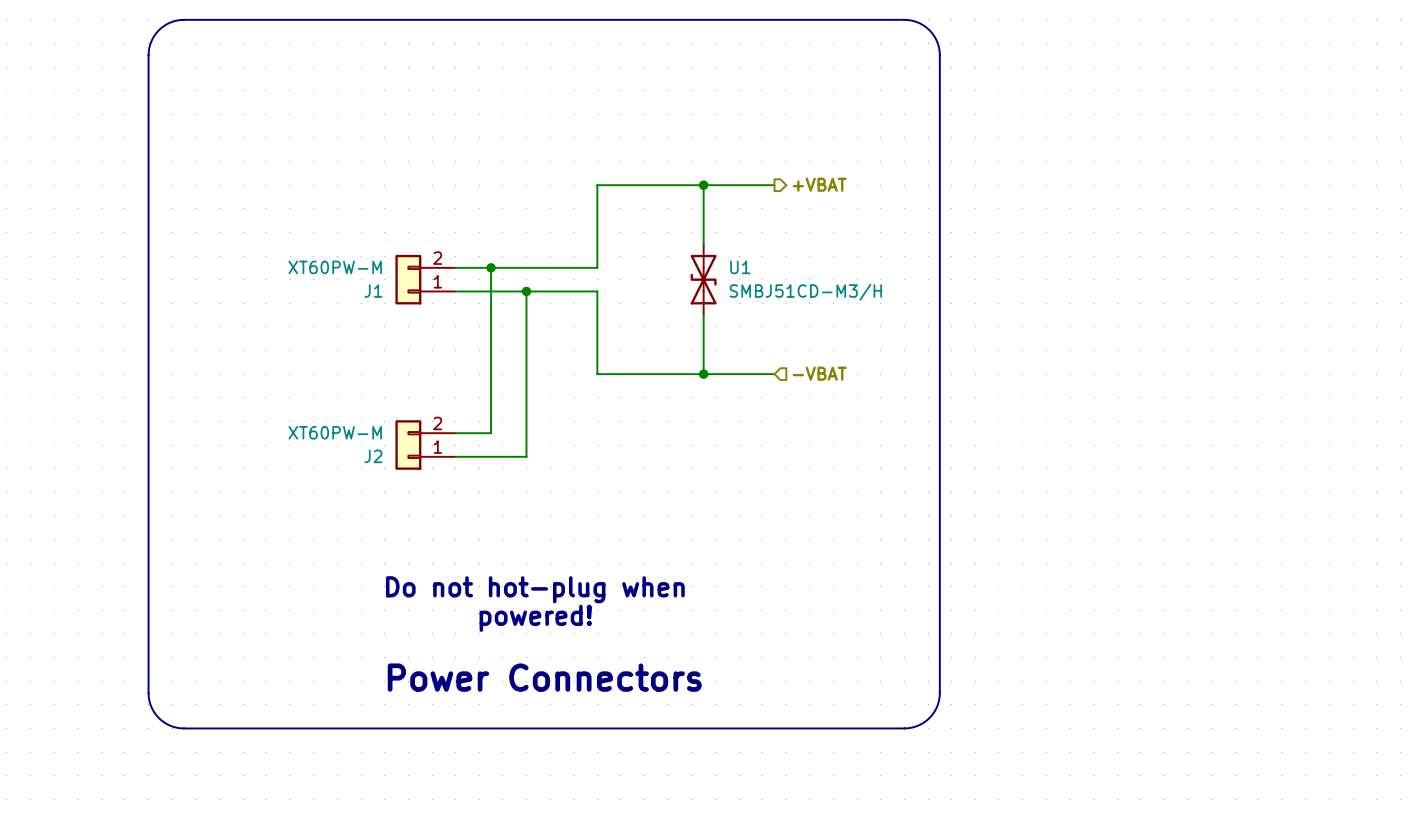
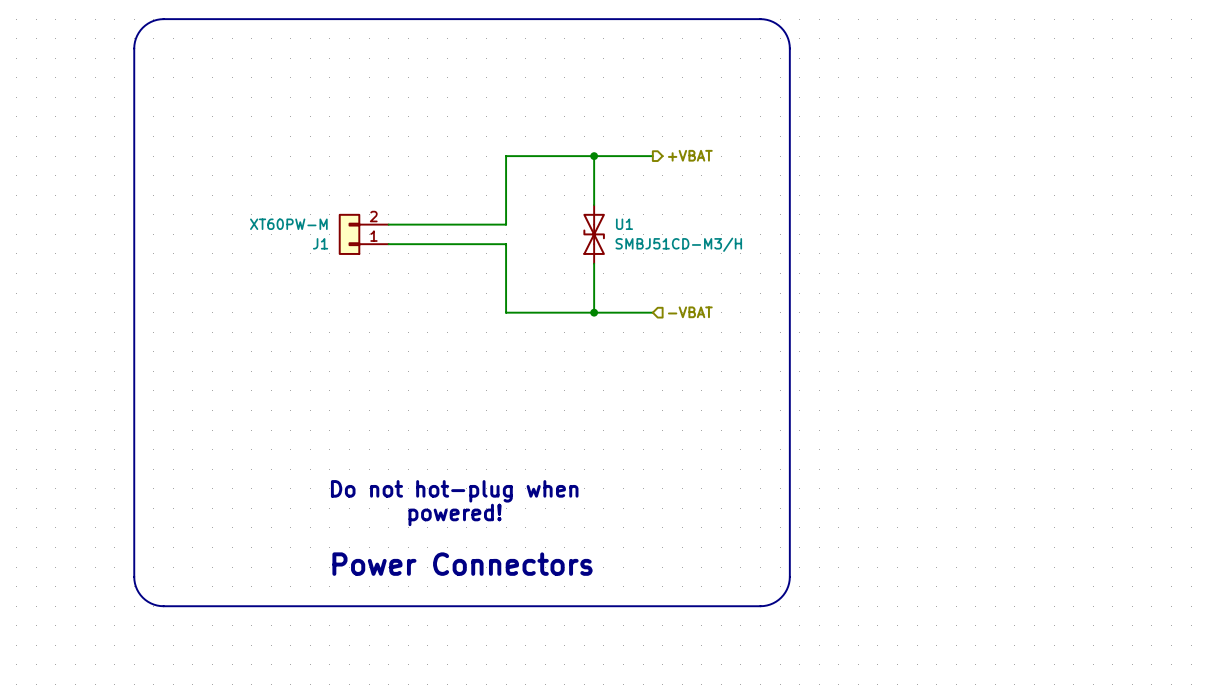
wire: (491, 267) (491, 433) (455, 433) -> none
junction: (491, 267) -> none
wire: (526, 291) (526, 456) (455, 456) -> none
junction: (526, 291) -> none
J2: XT60PW-M (425, 445) -> none

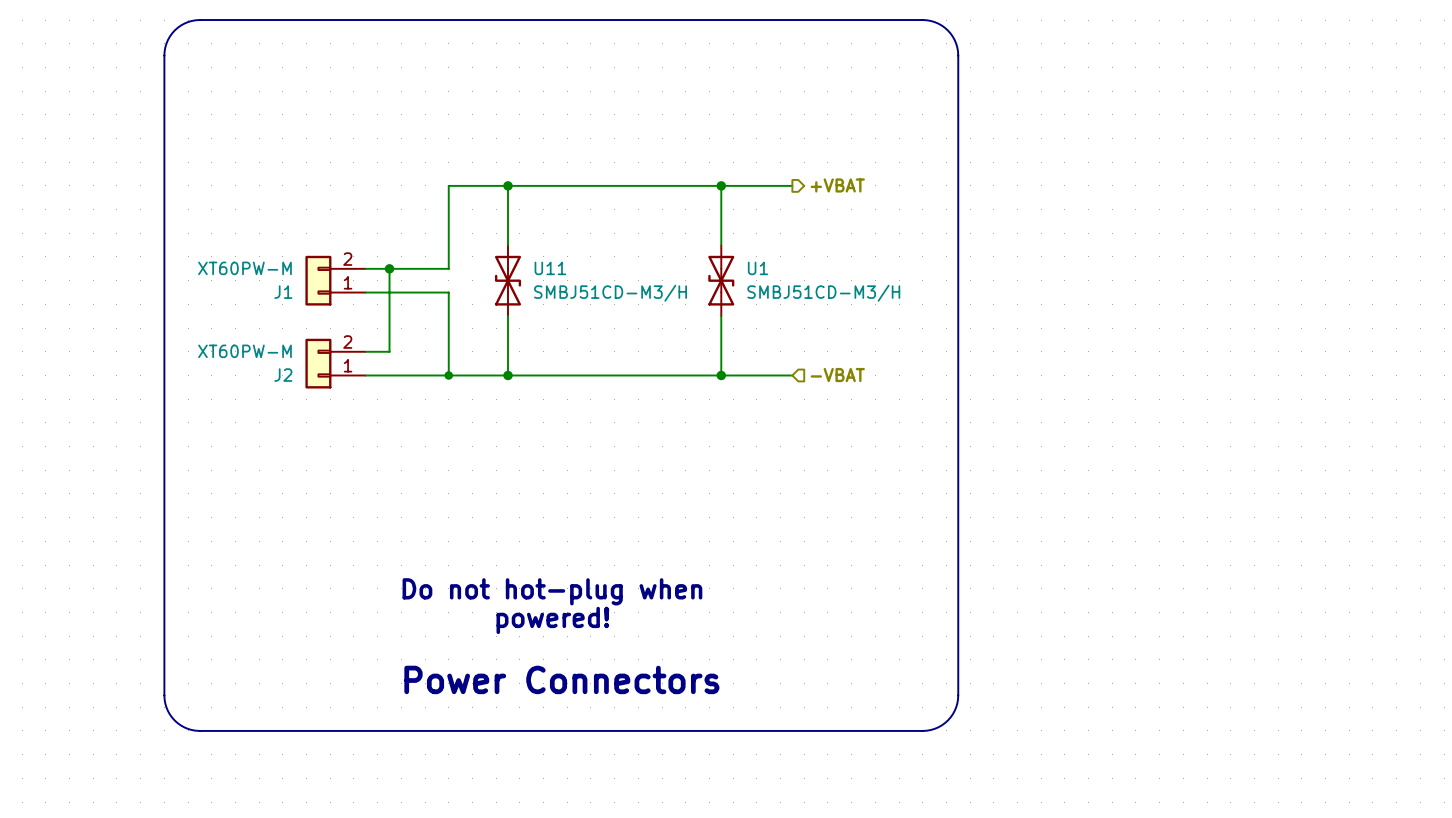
wire: none -> (508, 185) (508, 245)
junction: none -> (508, 185)
wire: (506, 156) (506, 224) (388, 224) -> (614, 185) (448, 185) (448, 268) (365, 268)
wire: none -> (389, 268) (389, 351) (365, 351)
junction: none -> (389, 268)
J1 position: (363, 234) -> (335, 280)
U11: none -> SMBJ51CD-M3/H (508, 280)
wire: none -> (365, 292) (448, 292) (448, 375)
wire: (388, 244) (506, 244) (506, 312) -> (365, 375) (614, 375)
wire: none -> (508, 316) (508, 375)
J2: none -> XT60PW-M (335, 363)
junction: none -> (448, 375)
junction: none -> (508, 375)

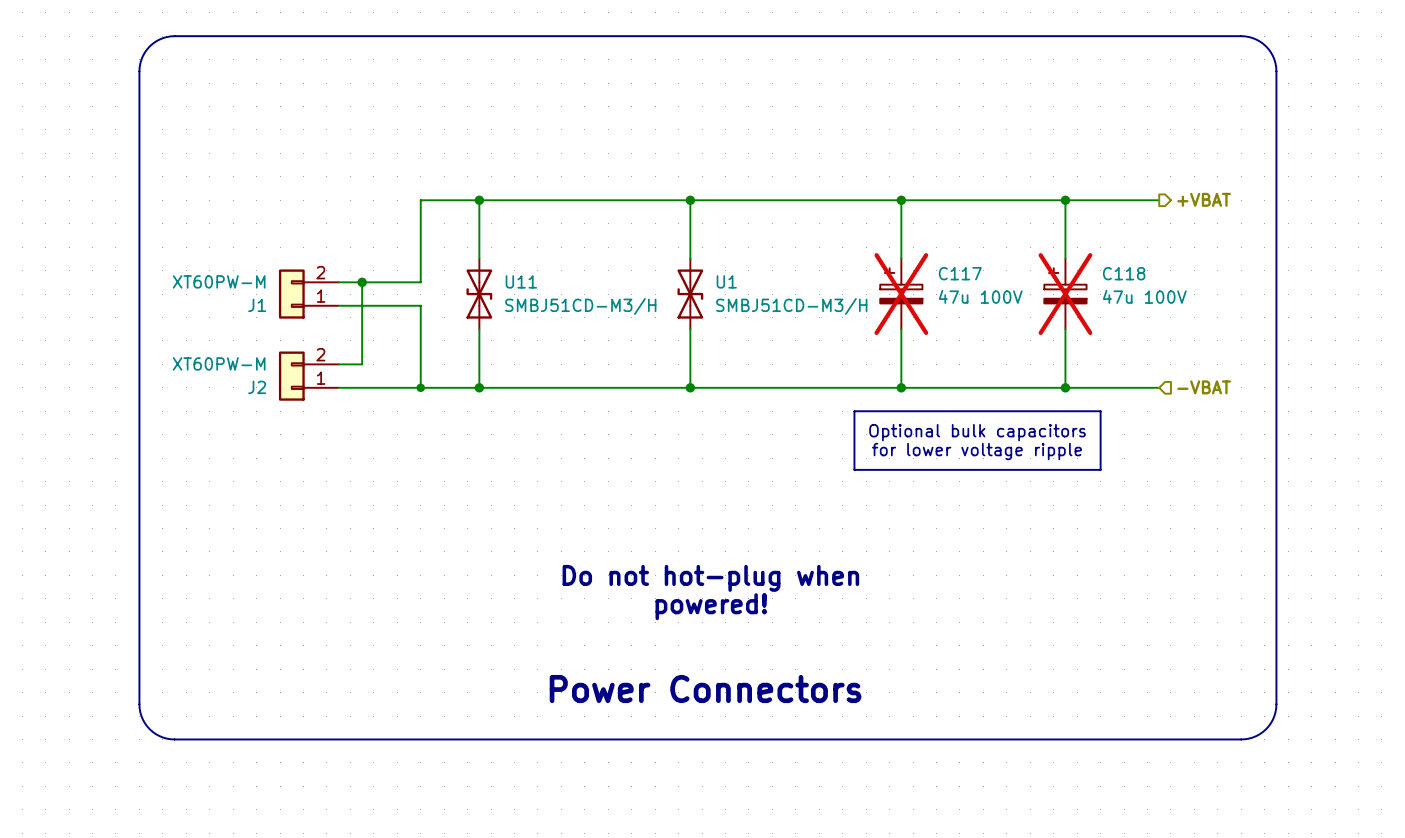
line: (922, 20) (938, 23) (947, 30) (954, 40) (958, 55) (958, 695) (956, 707) (947, 720) (934, 728) (922, 730) -> (889, 36) (1245, 36) (1259, 41) (1268, 49) (1274, 59) (1276, 71) (1276, 704) (1271, 723) (1256, 735) (1241, 739) (889, 739)
wire: none -> (760, 200) (1159, 200)
hierarchical label: +VBAT (837, 185) -> none
wire: none -> (901, 200) (901, 258)
junction: none -> (901, 200)
wire: none -> (1065, 200) (1065, 258)
junction: none -> (1065, 200)
hierarchical label: none -> +VBAT (1204, 199)
C117: none -> 47u 100V (901, 294)
C118: none -> 47u 100V (1065, 294)
wire: none -> (901, 329) (901, 387)
wire: none -> (1065, 329) (1065, 387)
wire: none -> (760, 387) (1159, 387)
hierarchical label: -VBAT (837, 375) -> none
junction: none -> (901, 387)
junction: none -> (1065, 387)
hierarchical label: none -> -VBAT (1204, 387)
line: none -> (854, 411) (1100, 411) (1100, 469) (854, 469) (854, 411)
text: none -> Optional bulk capacitors (977, 432)
text: none -> for lower voltage ripple (976, 451)
text position: Do not hot-plug when (552, 591) -> Do not hot-plug when (710, 578)
text position: powered! (552, 620) -> powered! (711, 606)
text position: Power Connectors (561, 679) -> Power Connectors (705, 689)

